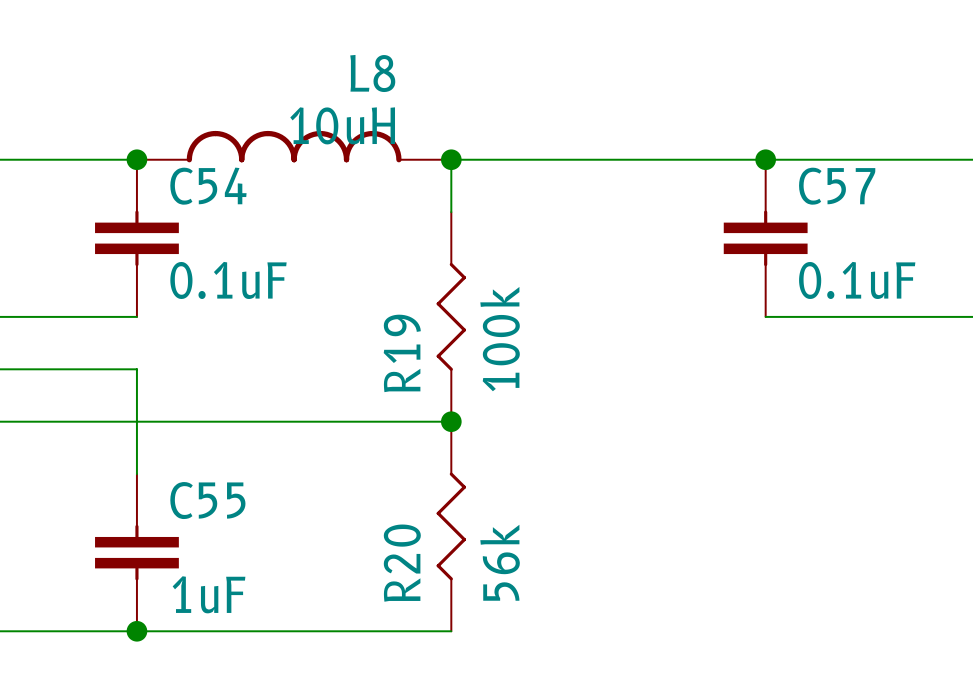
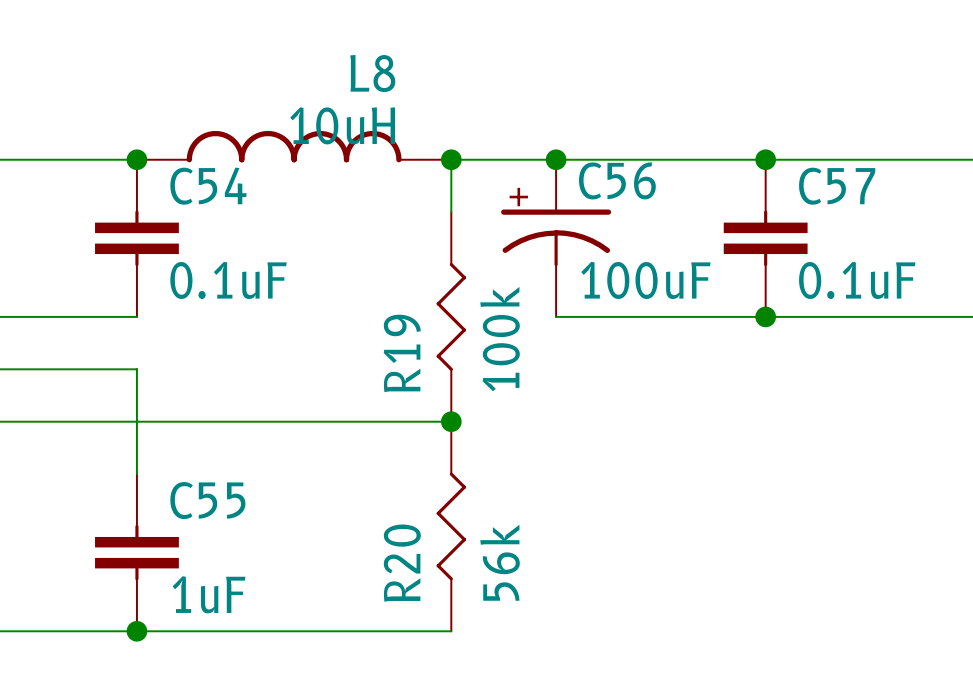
junction: none -> (556, 159)
C56: none -> 100uF (556, 238)
wire: none -> (556, 316) (765, 316)
junction: none -> (765, 316)

